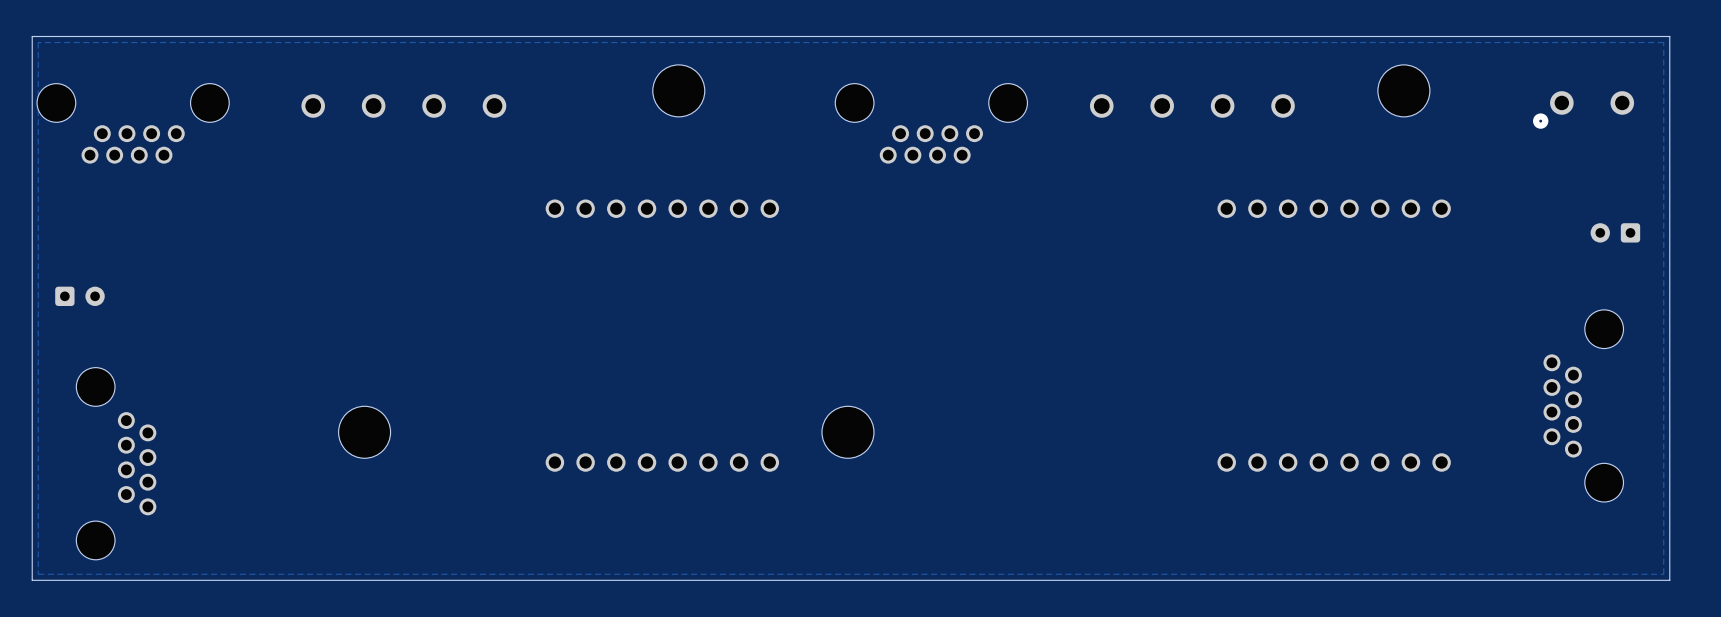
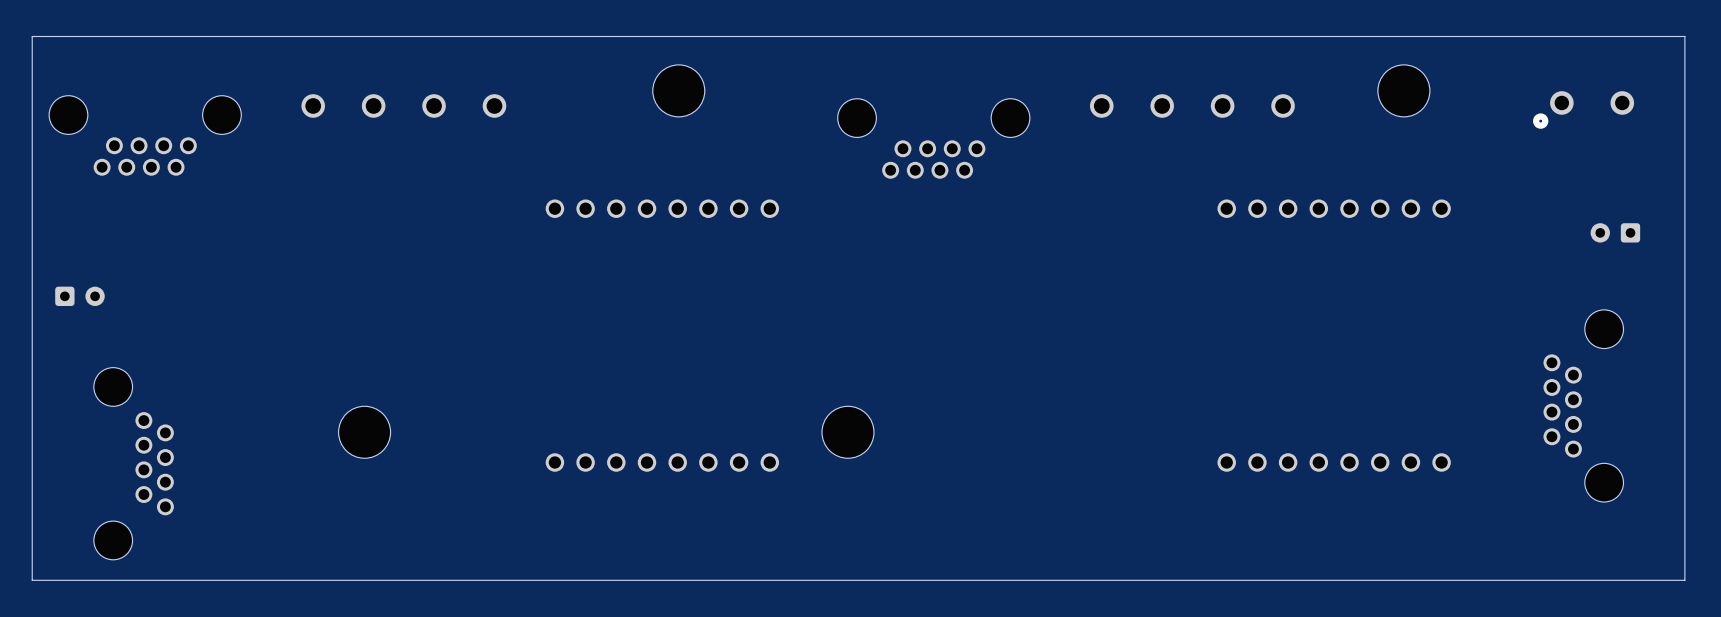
board edge: (1669, 36) (1669, 580) -> (1669, 36) (1684, 36) (1684, 580) (1669, 580)
zone outline: (1663, 42) (38, 42) (38, 574) (1663, 574) (1663, 42) -> none
part position: (133, 123) -> (145, 135)
part position: (931, 123) -> (933, 138)
part position: (116, 463) -> (133, 463)

